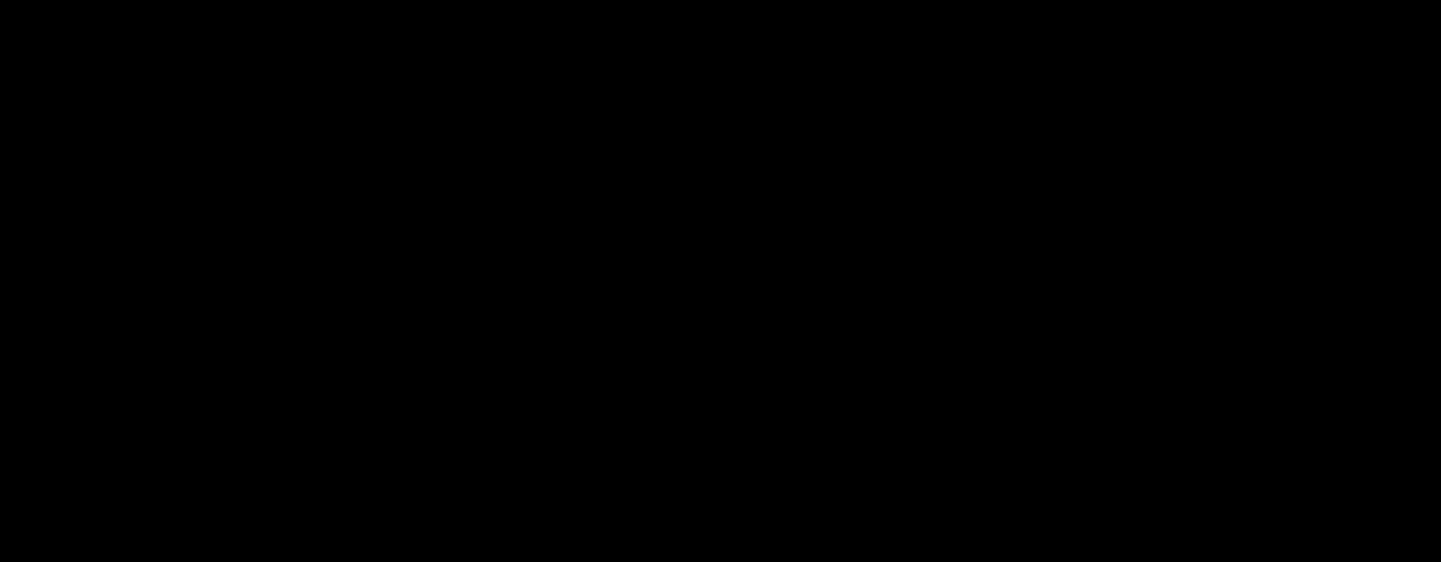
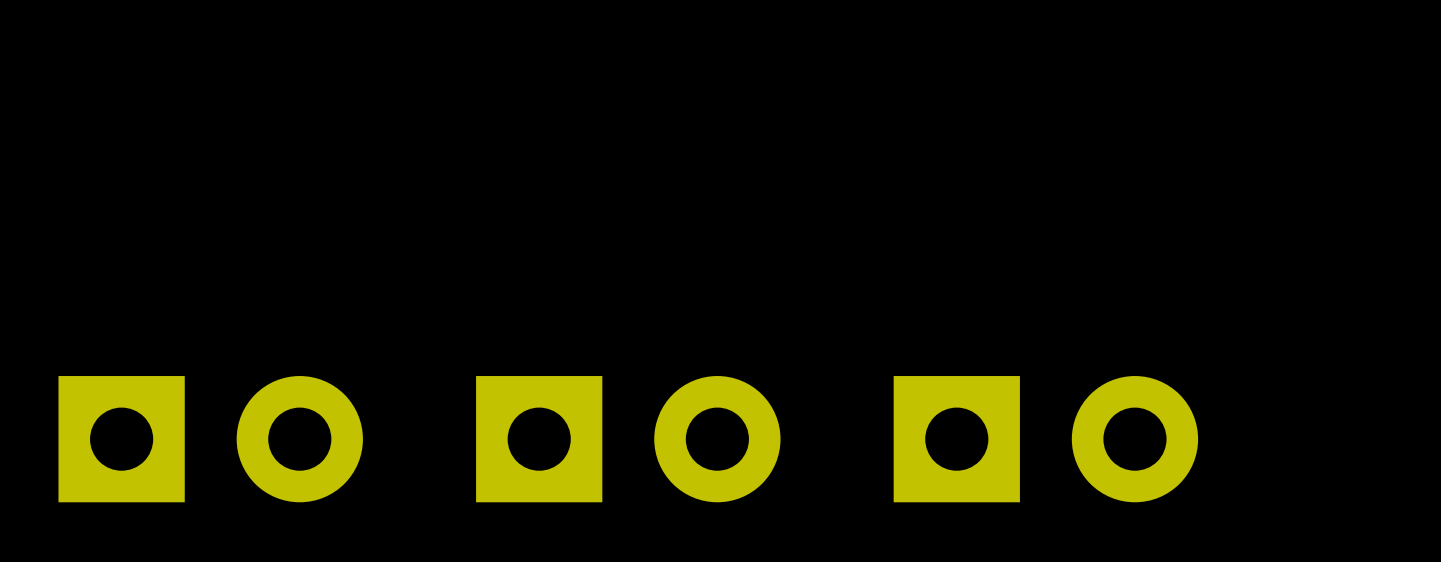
part: none -> (210, 439)
part: none -> (628, 439)
part: none -> (1045, 439)

